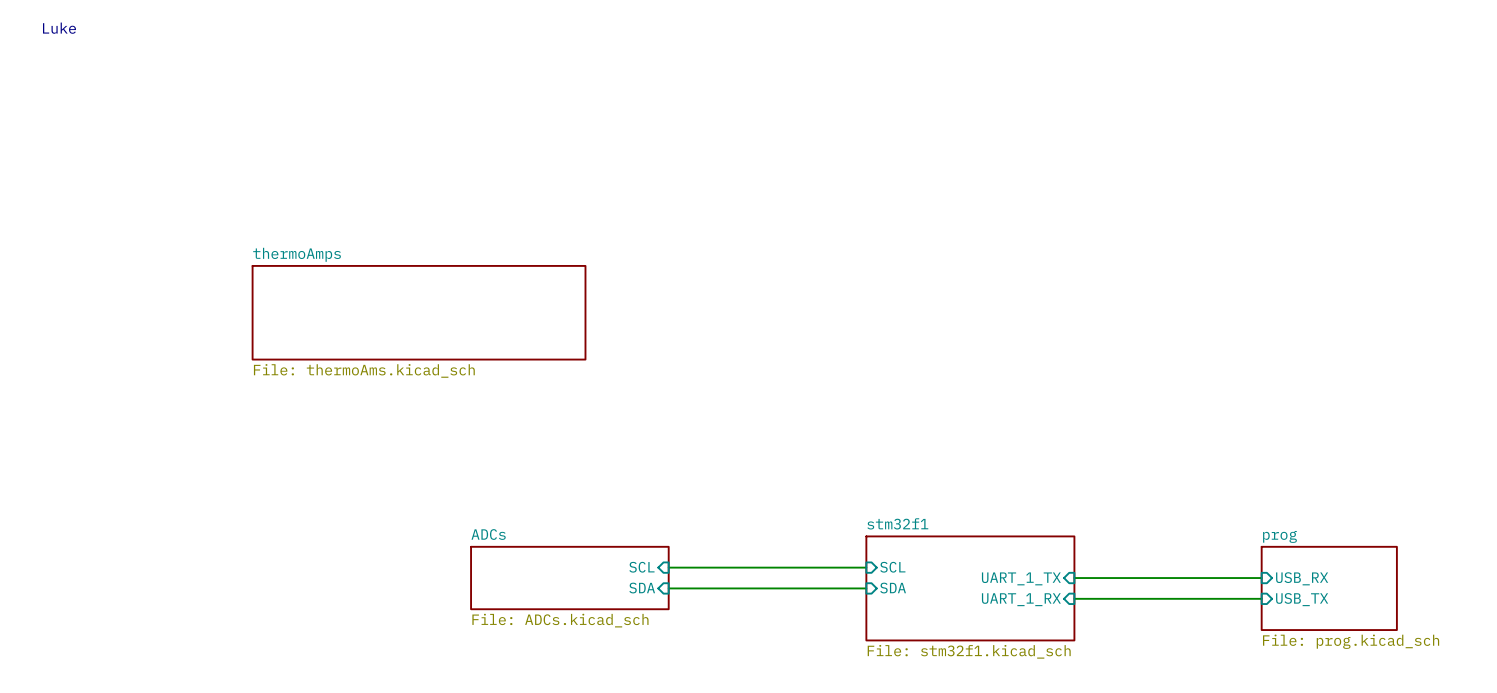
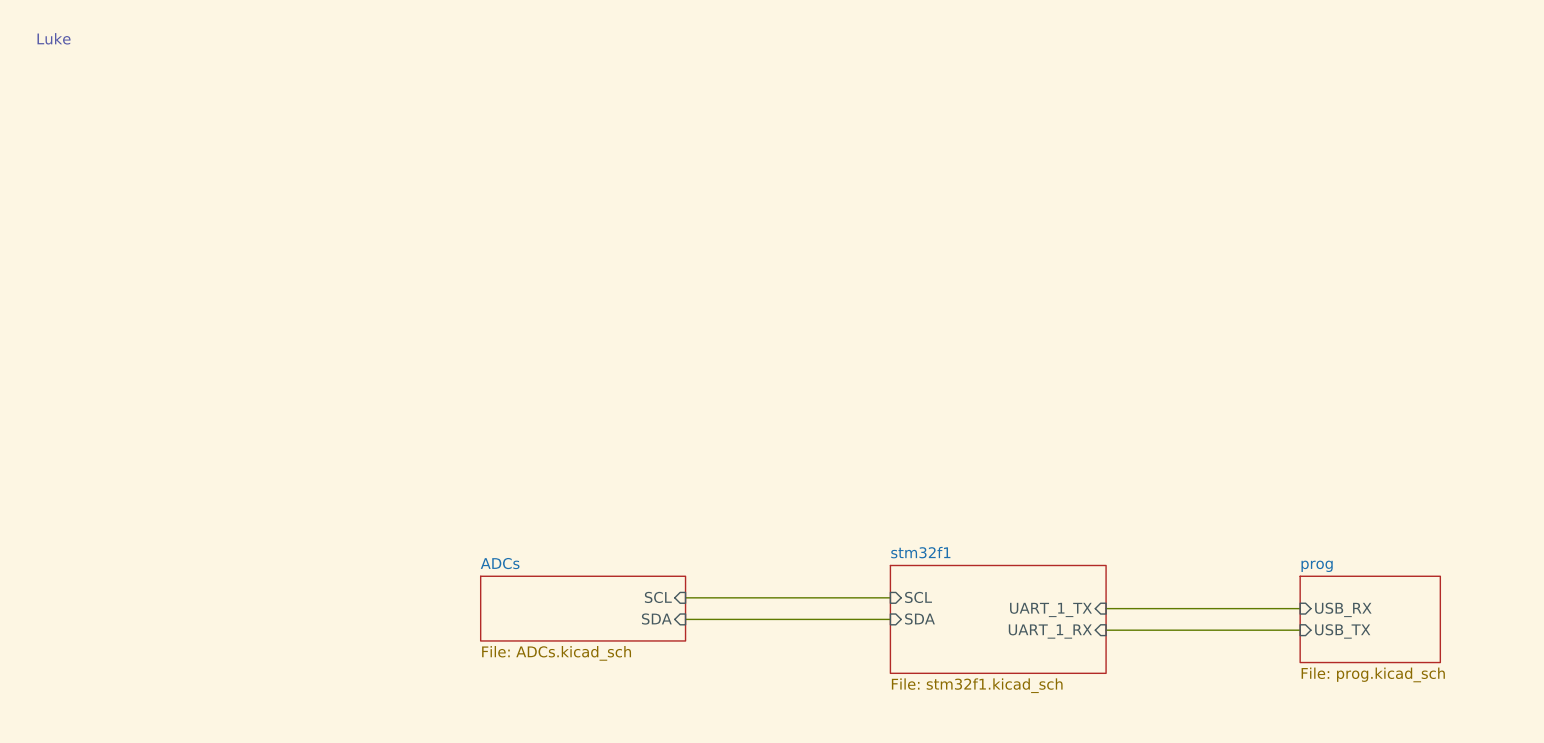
sheet thermoAmps: File: thermoAms.kicad_sch (419, 312) -> none

